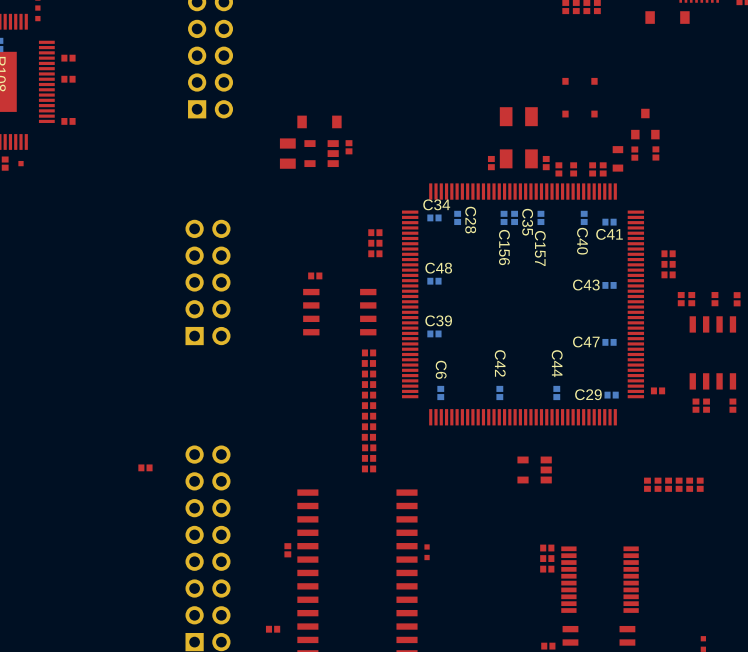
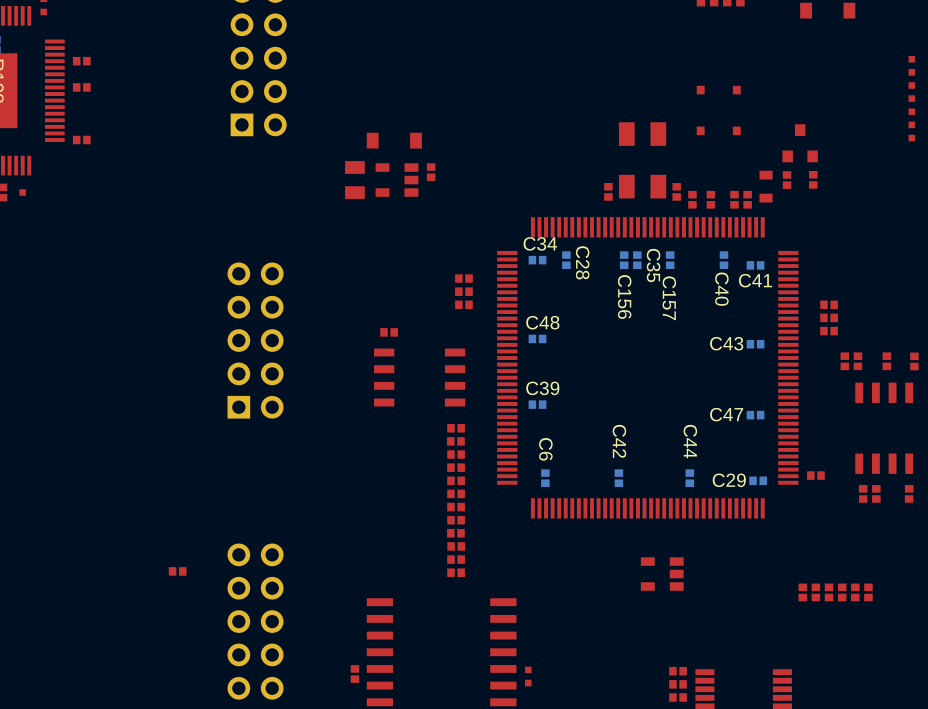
part: none -> (911, 59)
part: none -> (911, 72)
part: none -> (911, 85)
part: none -> (911, 98)
part: none -> (911, 111)
part: none -> (911, 124)
part: none -> (911, 138)

